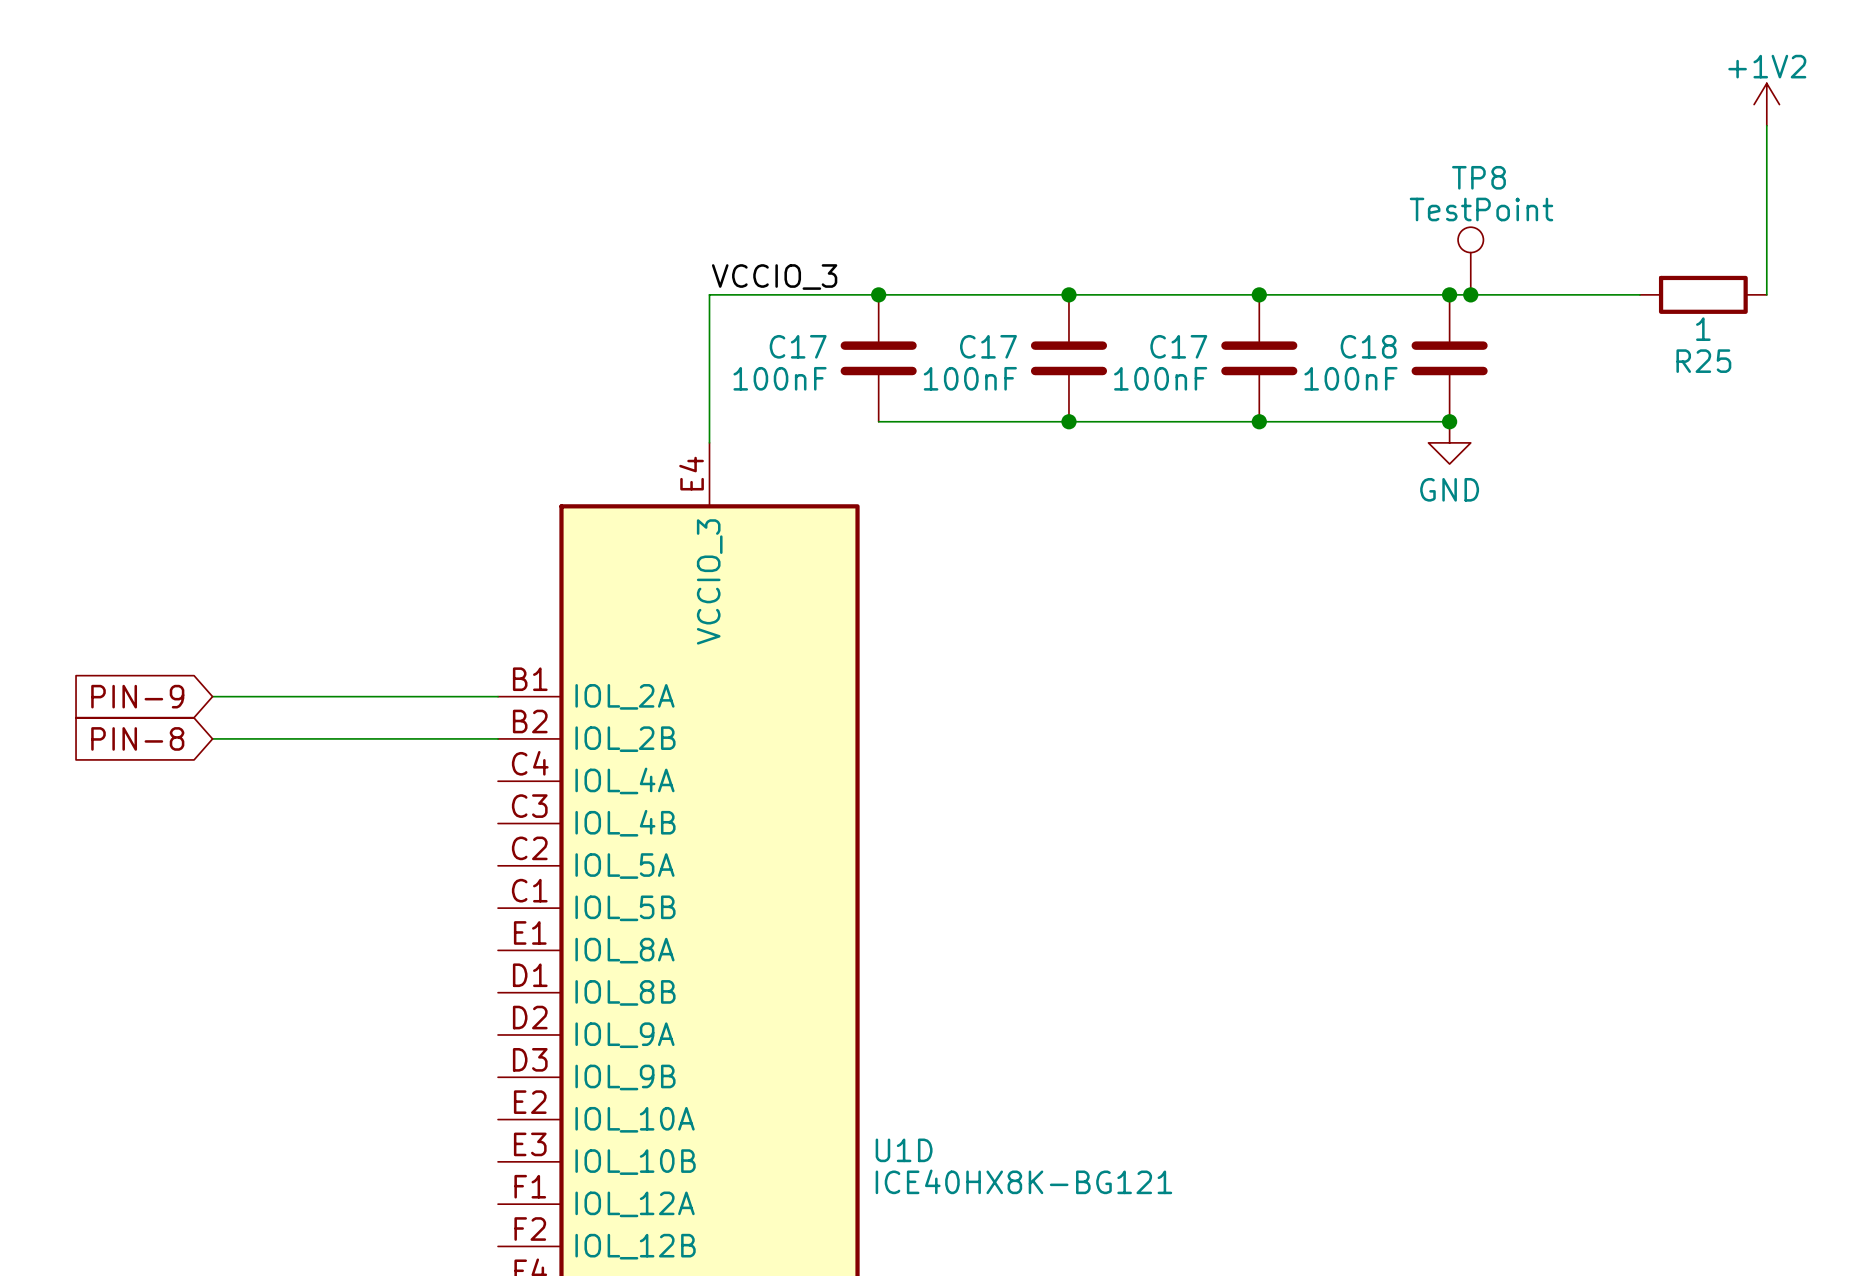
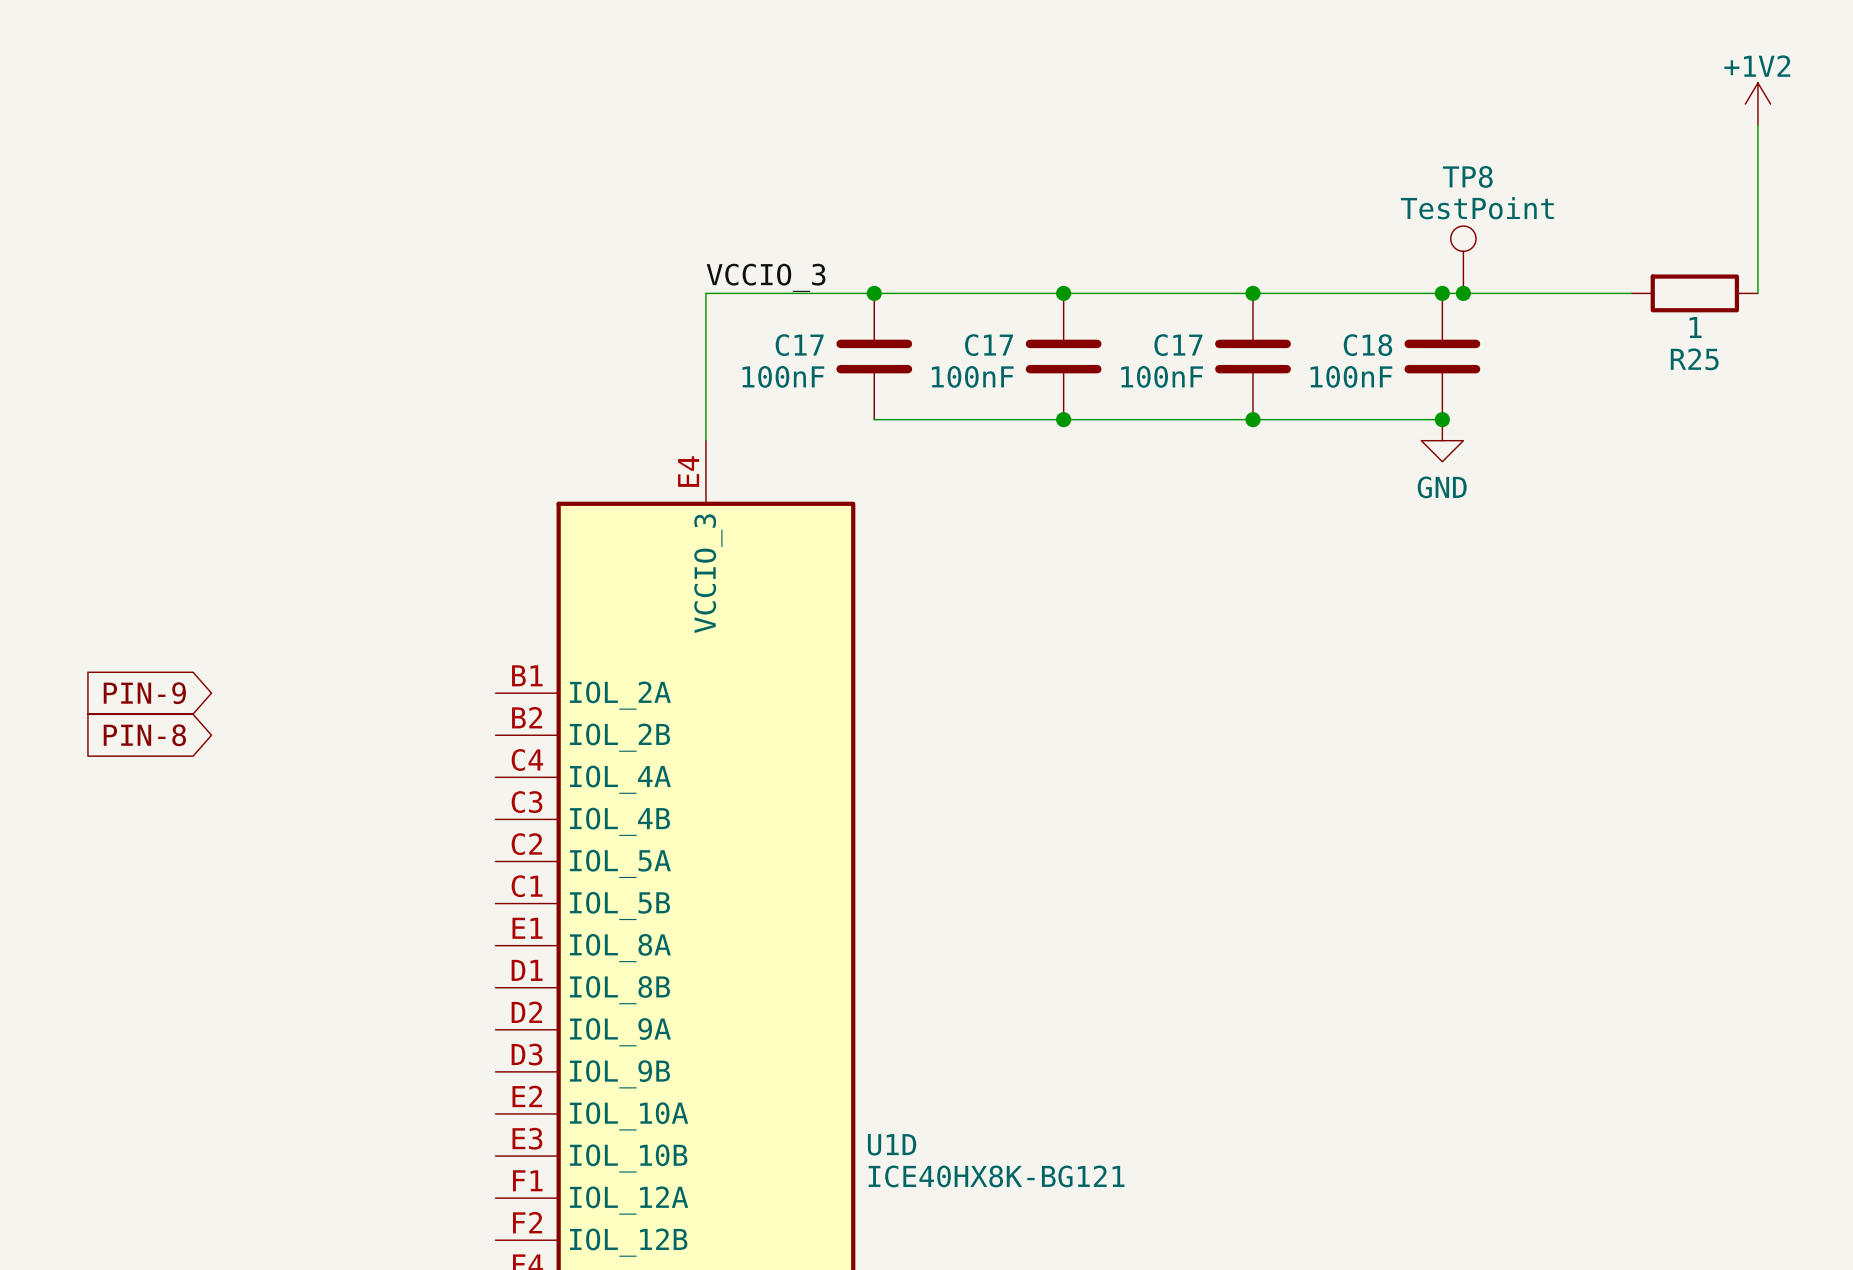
wire: (212, 696) (498, 696) -> none
wire: (212, 738) (498, 738) -> none

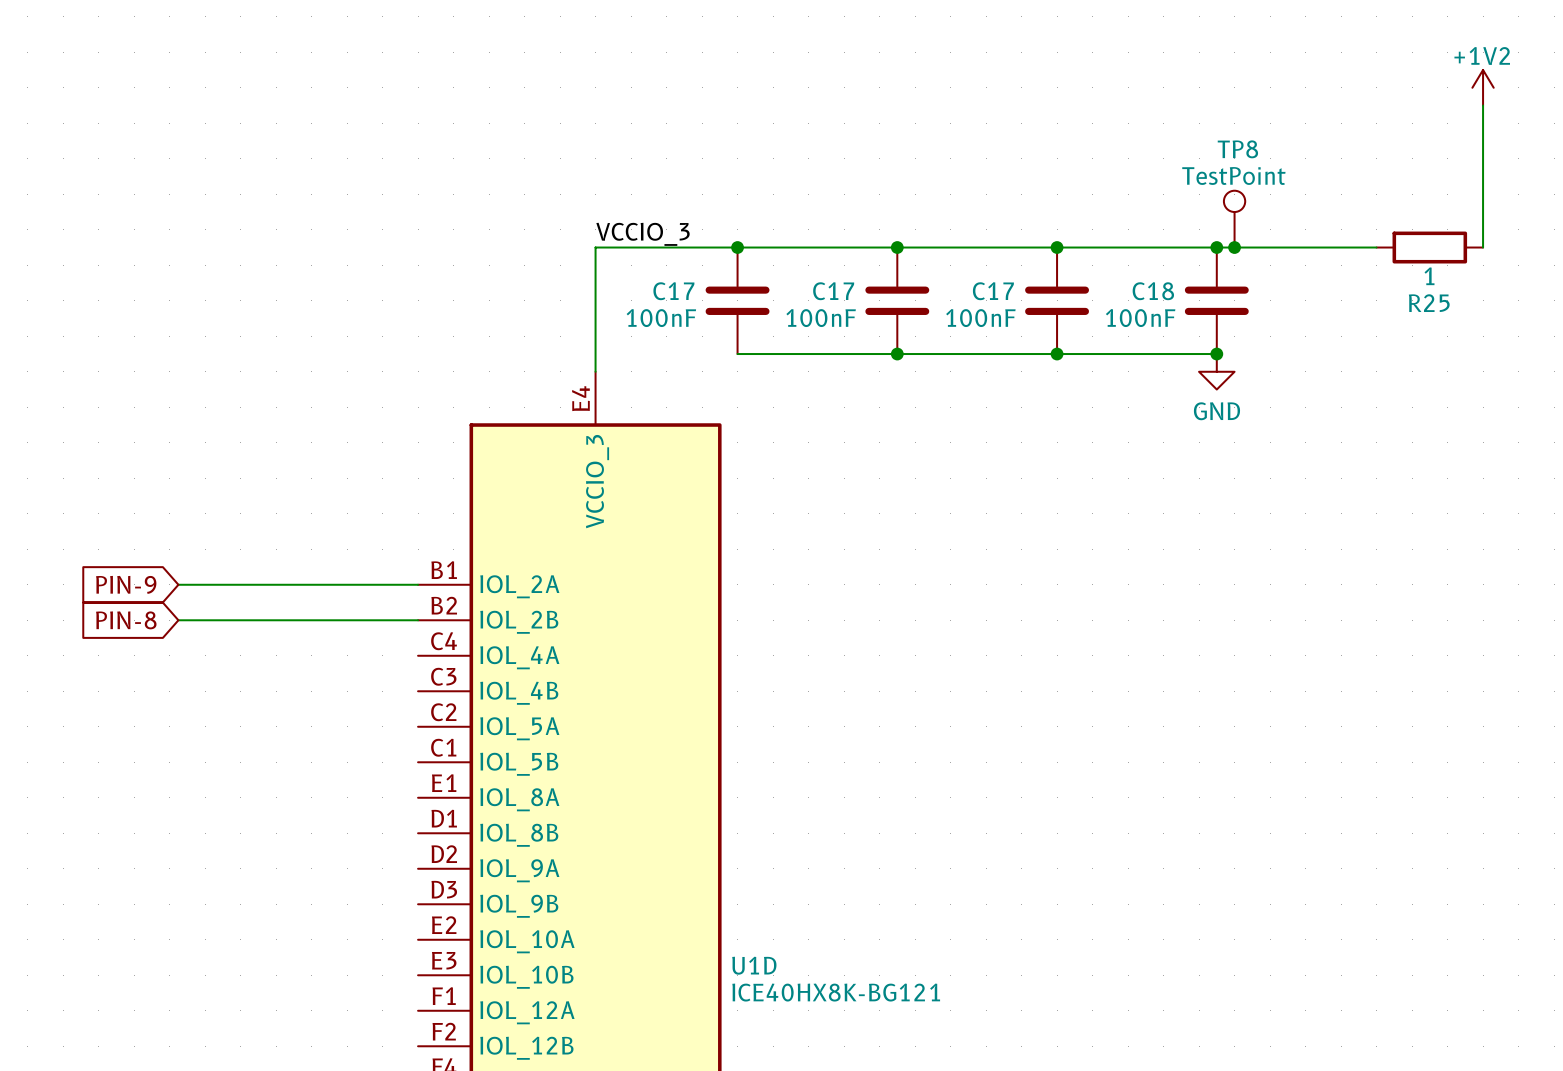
wire: none -> (178, 584) (418, 584)
wire: none -> (178, 620) (418, 620)

